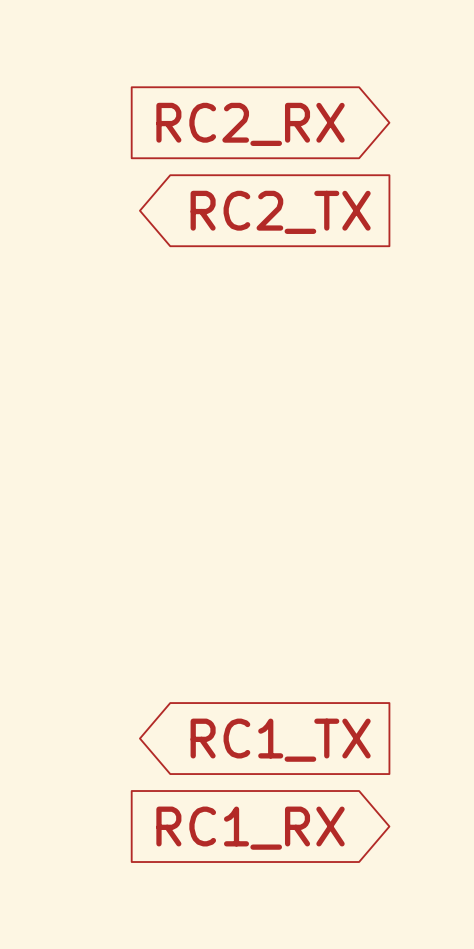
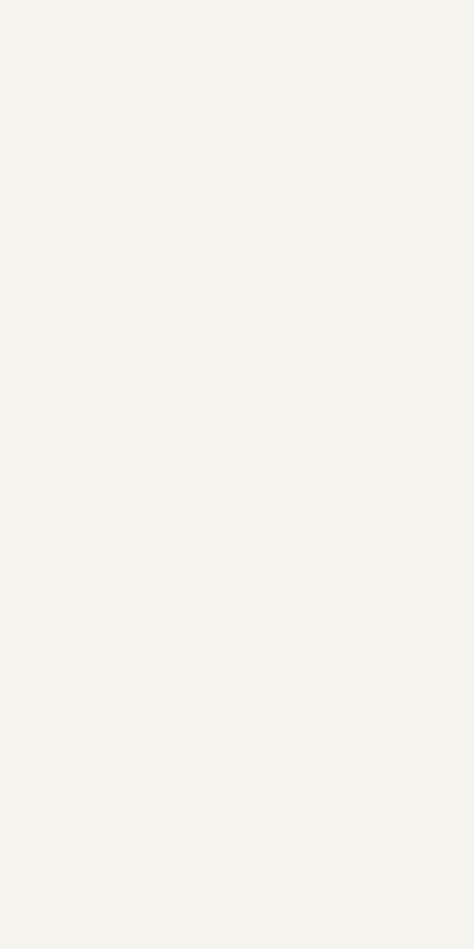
global label: RC2_RX (250, 124) -> none
global label: RC2_TX (280, 212) -> none
global label: RC1_TX (280, 740) -> none
global label: RC1_RX (250, 828) -> none

